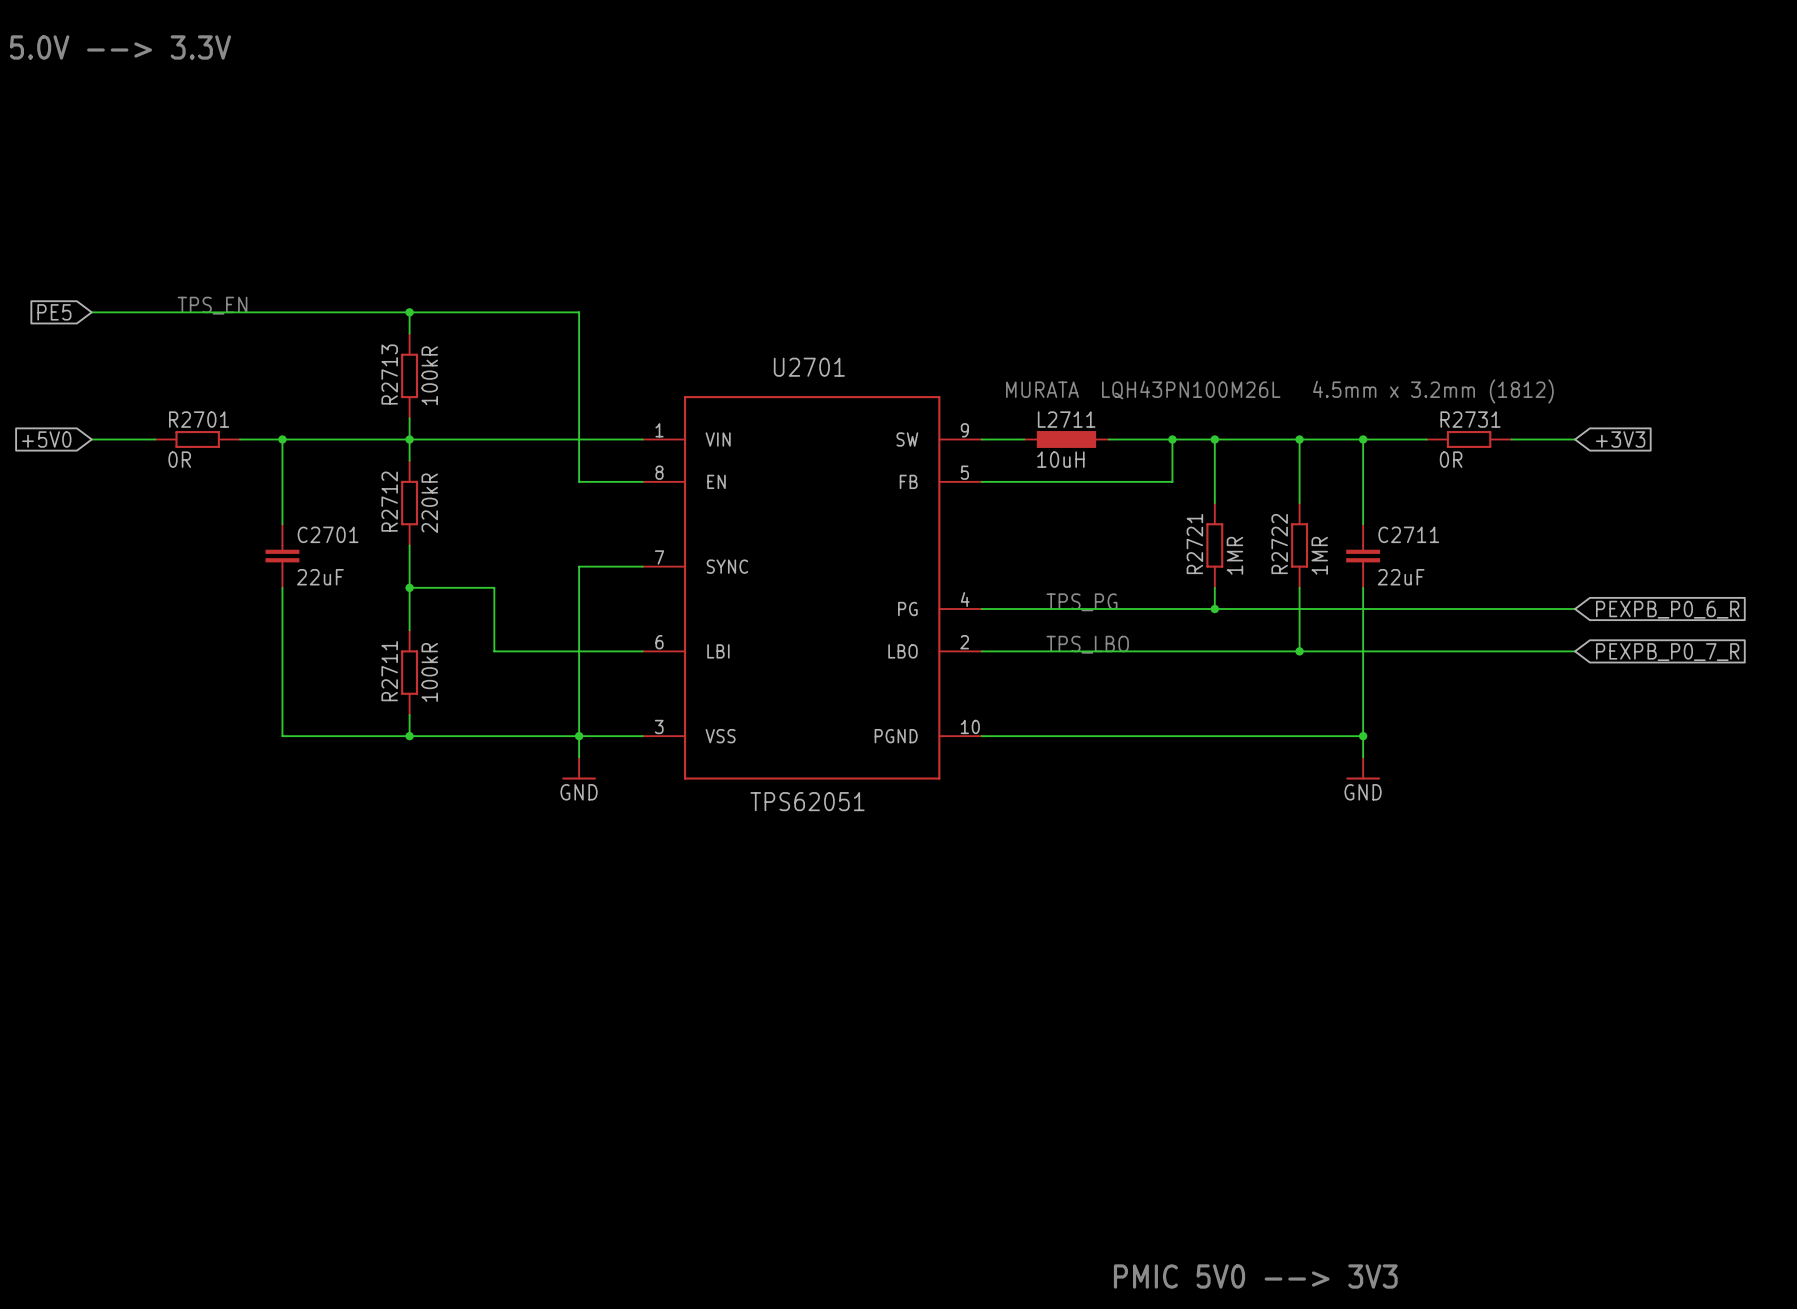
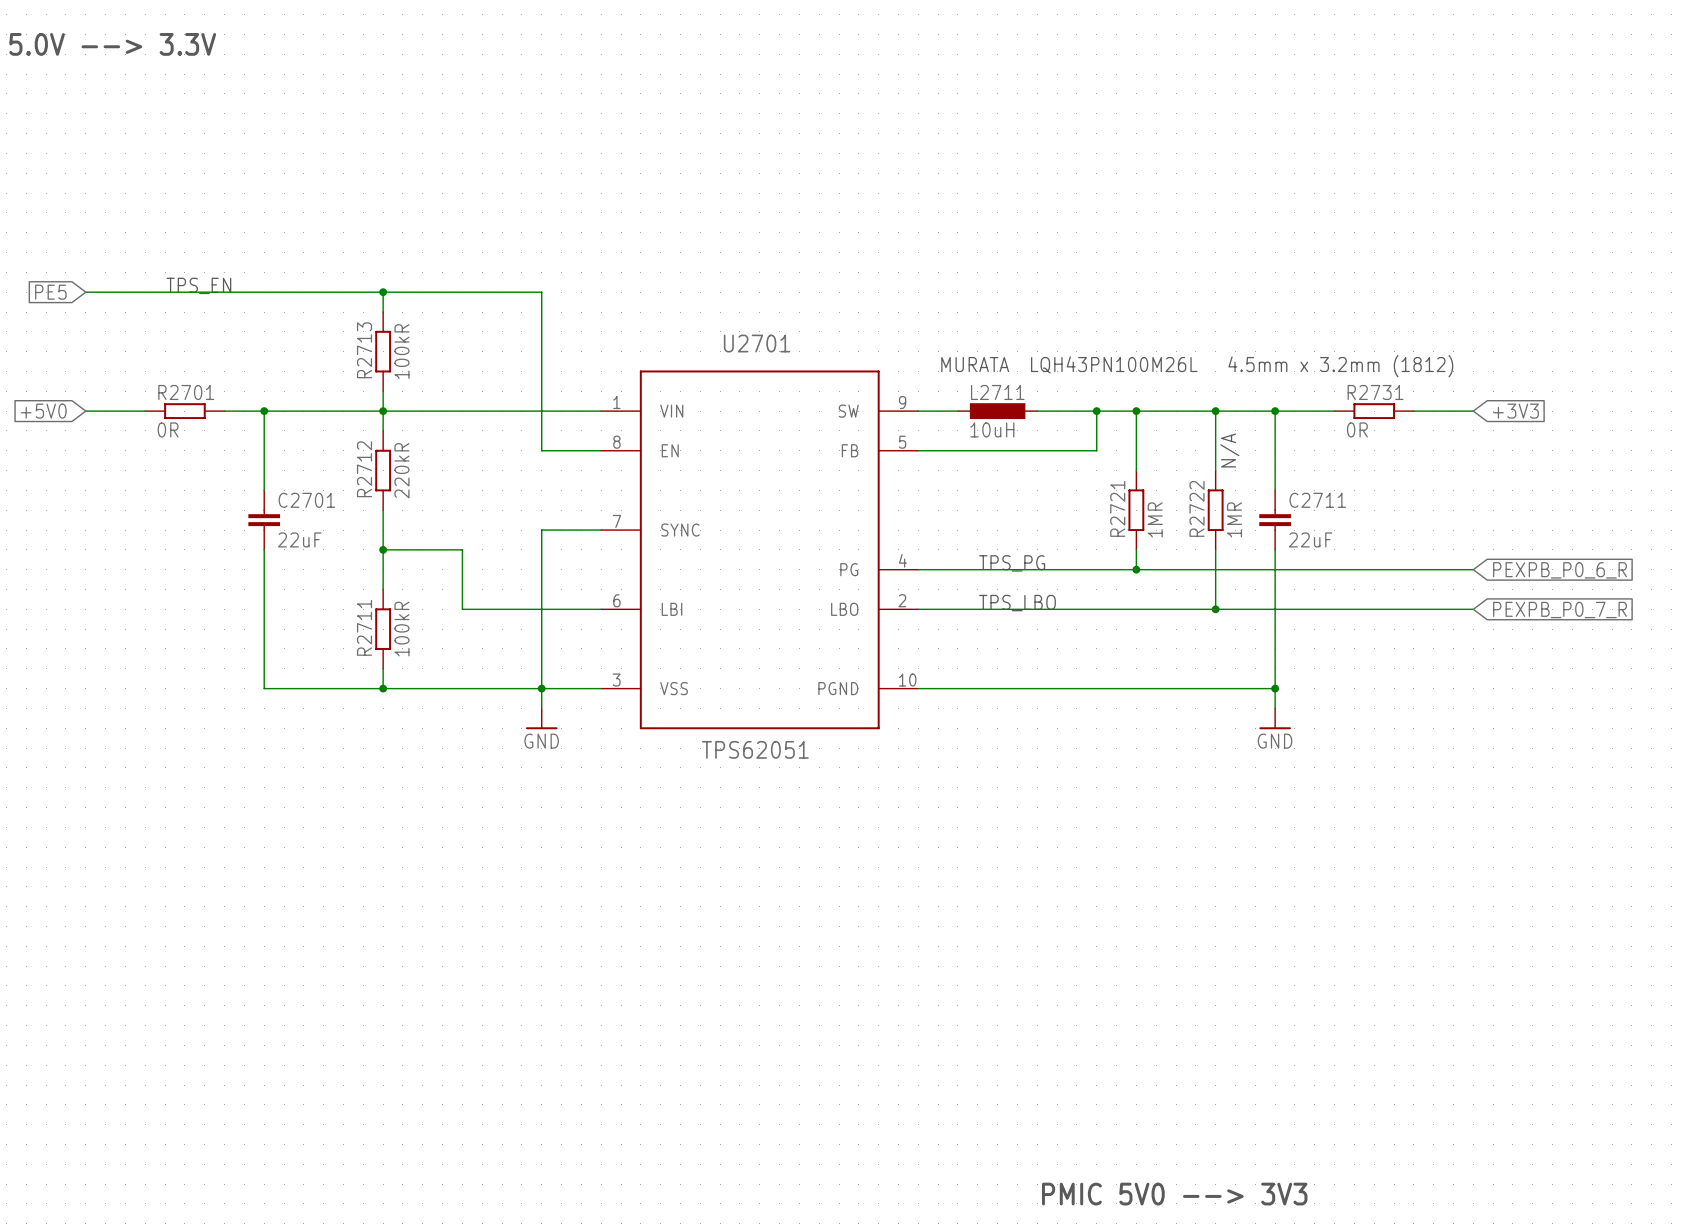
text: none -> N/A (1229, 450)

